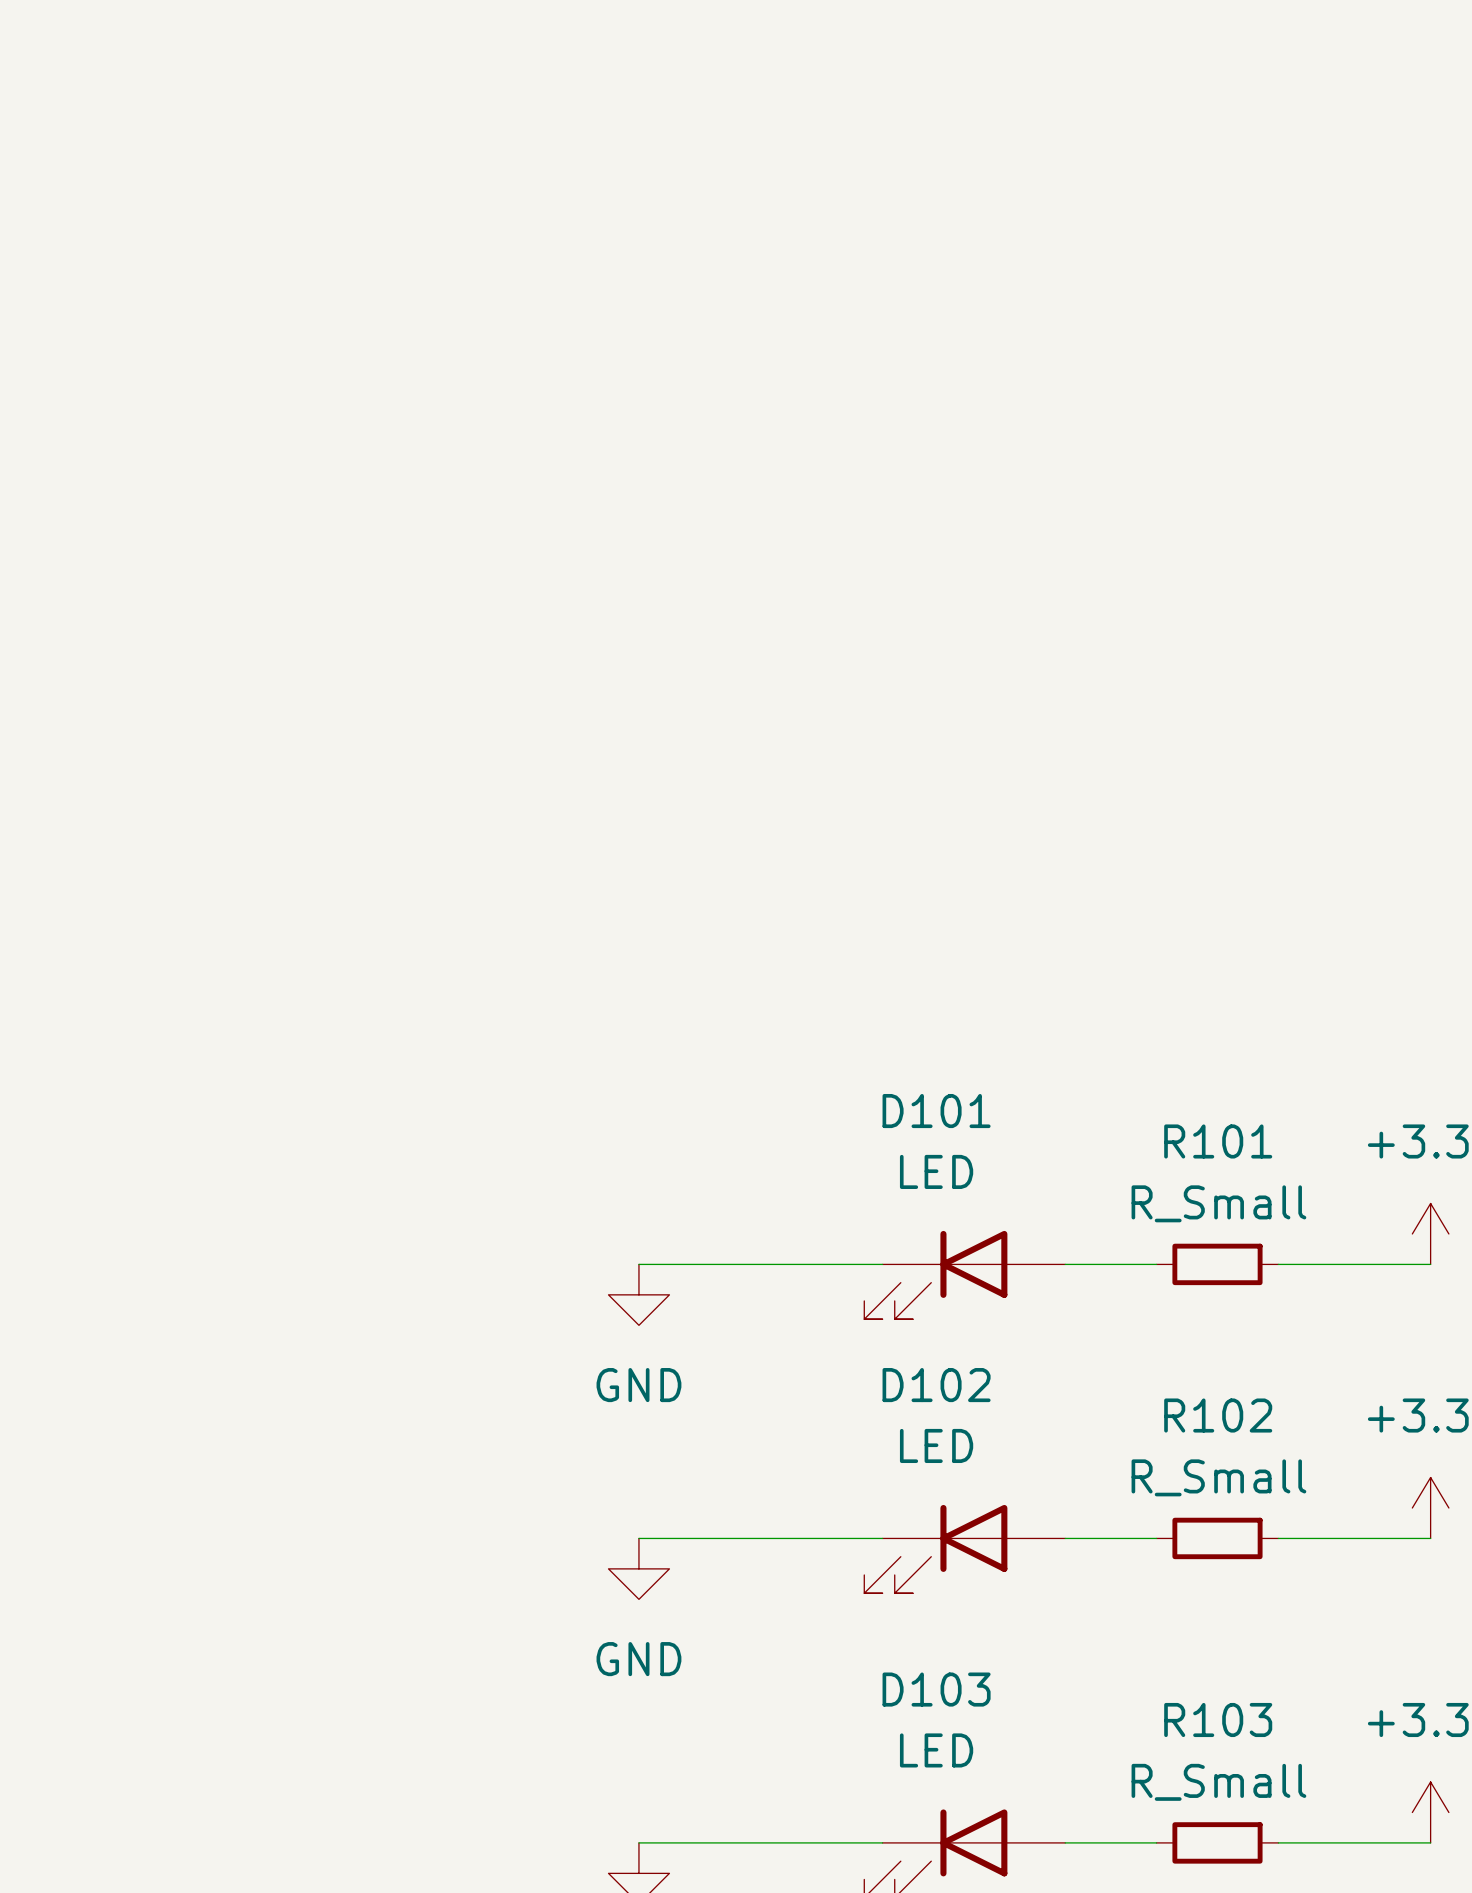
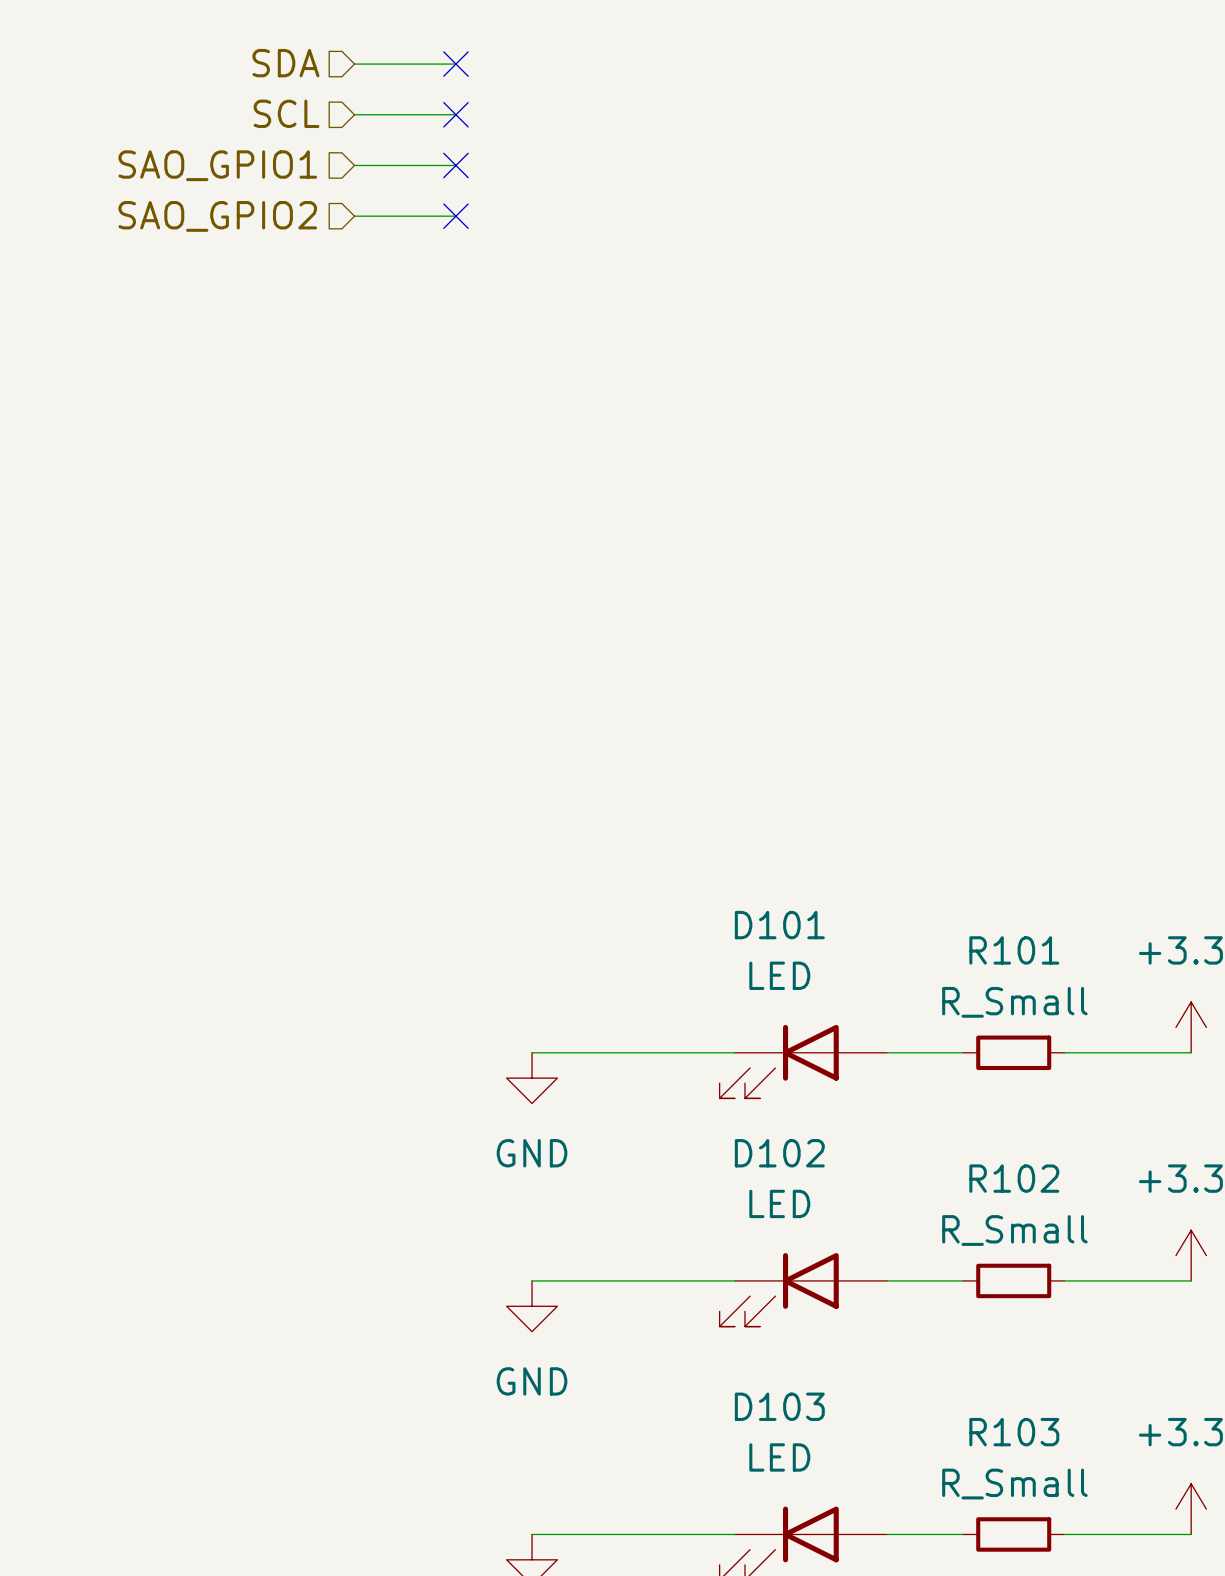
hierarchical label: none -> SDA (285, 63)
wire: none -> (354, 64) (455, 64)
no-connect mark: none -> (455, 64)
hierarchical label: none -> SCL (286, 113)
wire: none -> (354, 114) (455, 114)
no-connect mark: none -> (455, 114)
wire: none -> (354, 165) (455, 165)
no-connect mark: none -> (455, 165)
hierarchical label: none -> SAO_GPIO1 (217, 165)
hierarchical label: none -> SAO_GPIO2 (217, 216)
wire: none -> (354, 216) (455, 216)
no-connect mark: none -> (455, 216)

